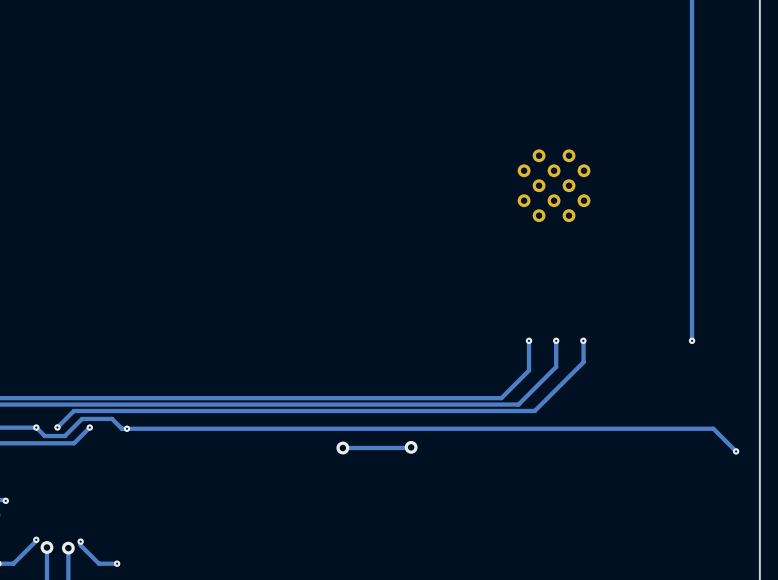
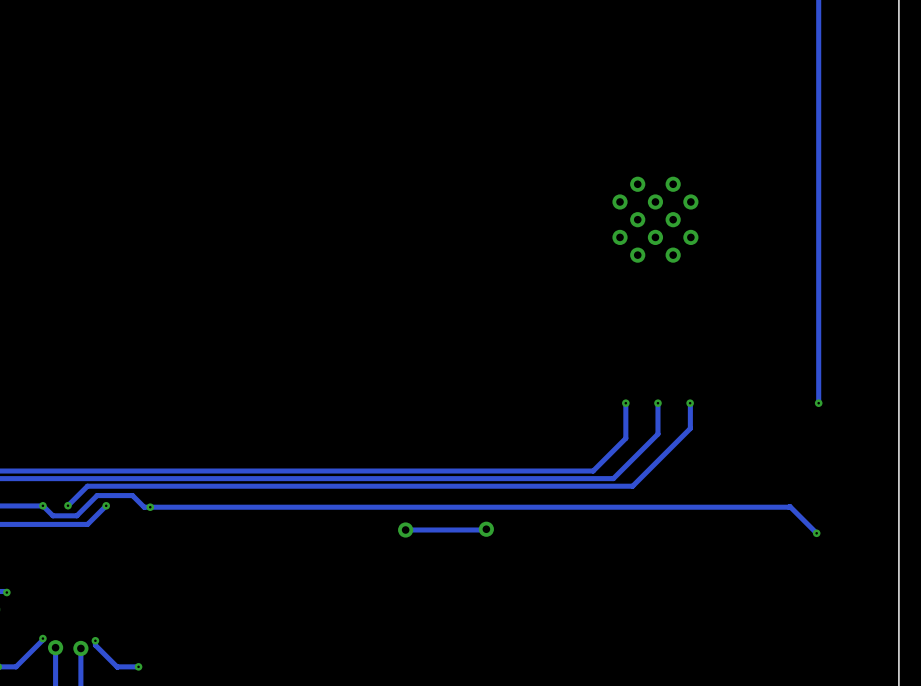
track: (667, 428) (713, 428) (736, 451) -> (789, 507) (816, 533)
via position: (736, 451) -> (816, 533)

